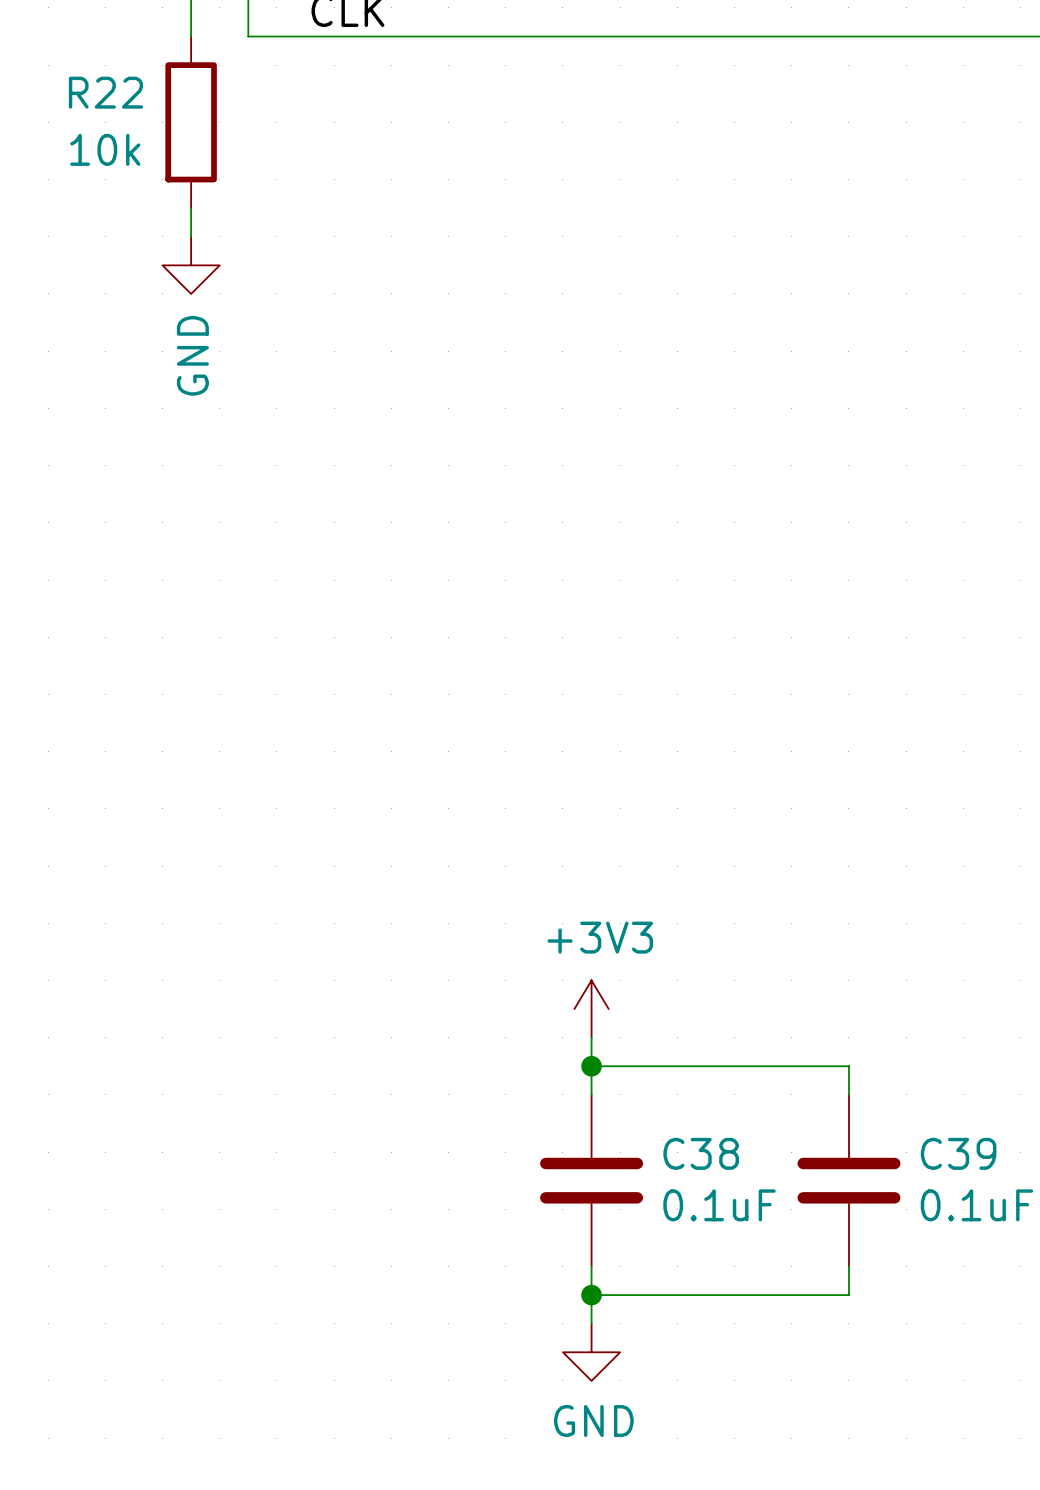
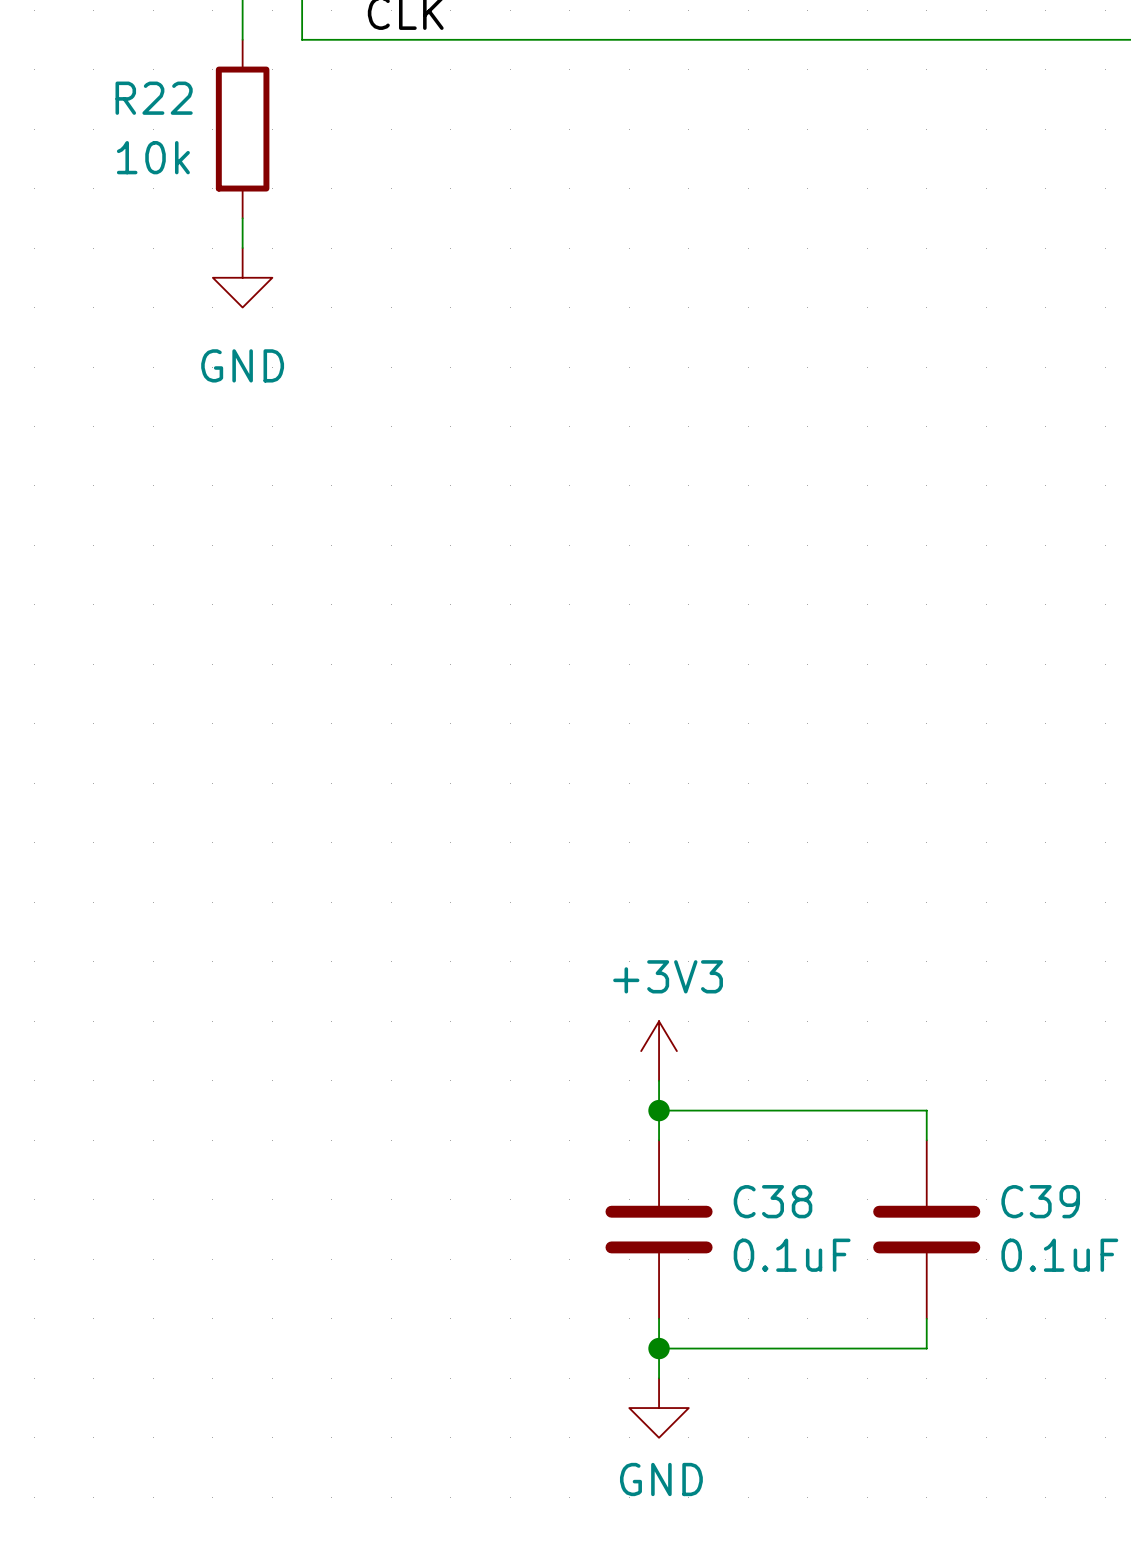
power symbol text rotation: 0° (192, 355) -> 90° clockwise (242, 365)

